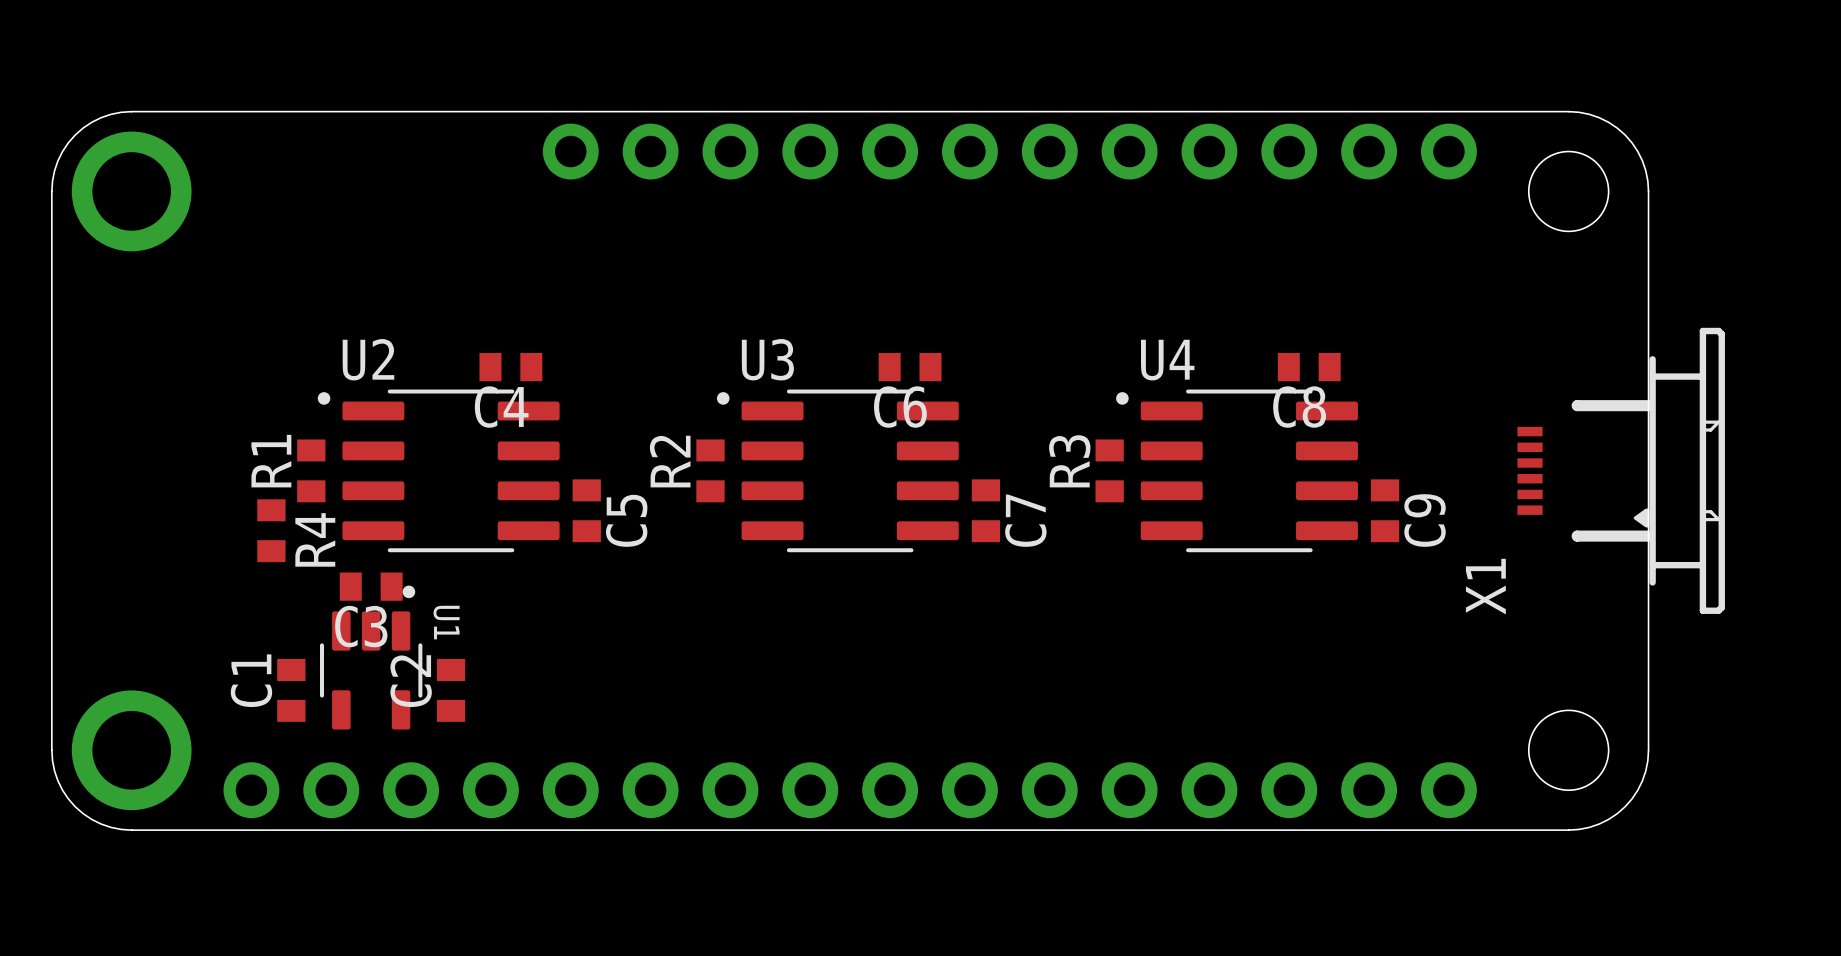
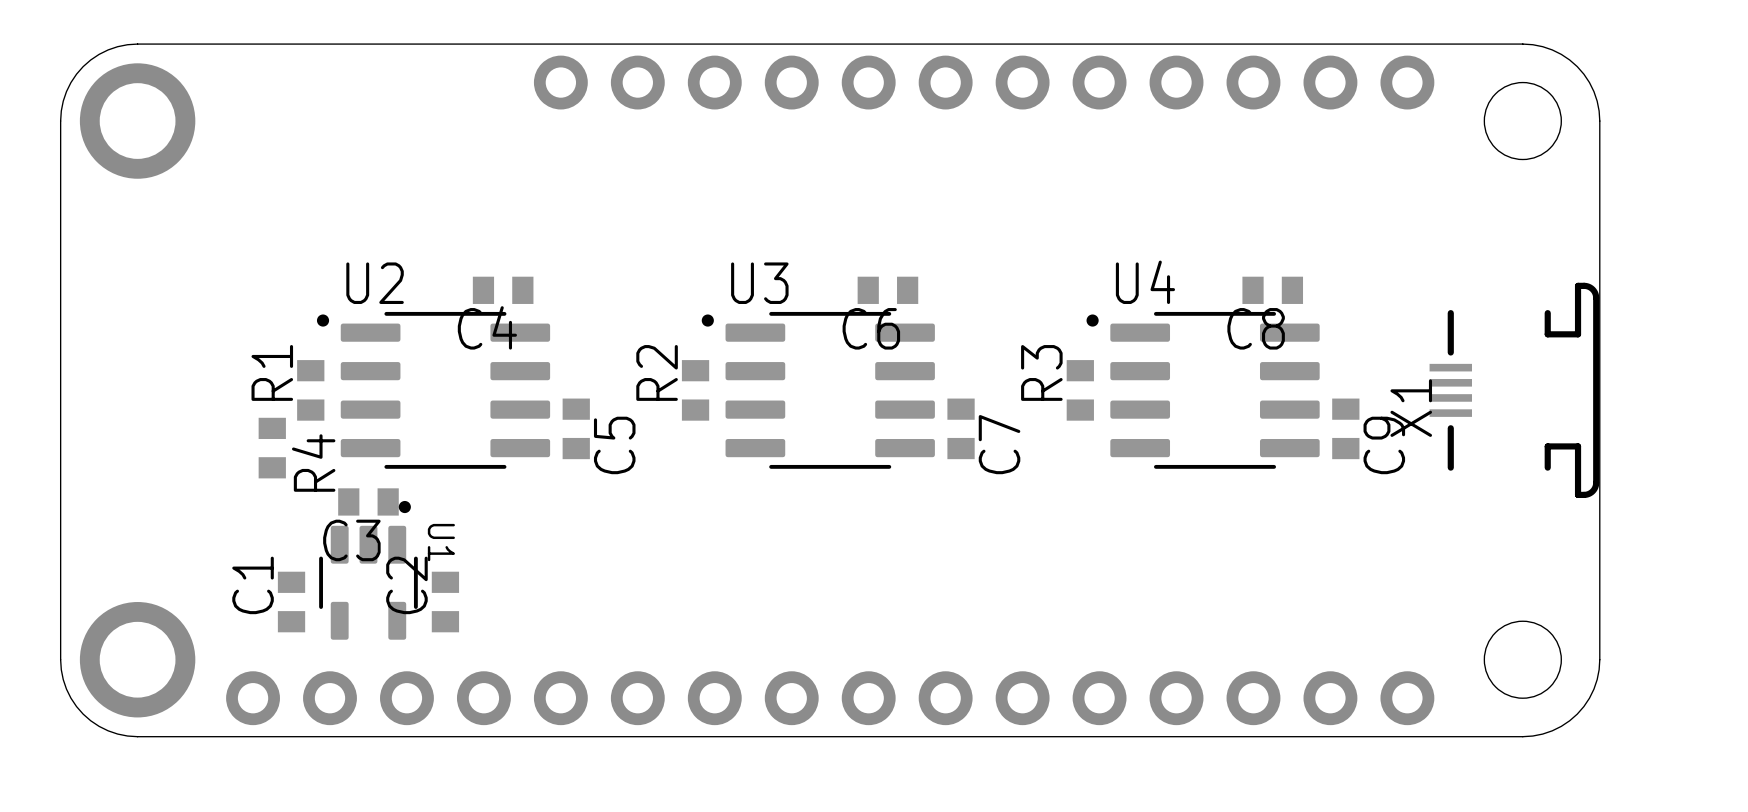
X1 footprint: [1517, 327, 1725, 614] -> [1429, 282, 1600, 498]
X1 name position: X1 (1485, 586) -> X1 (1411, 408)

